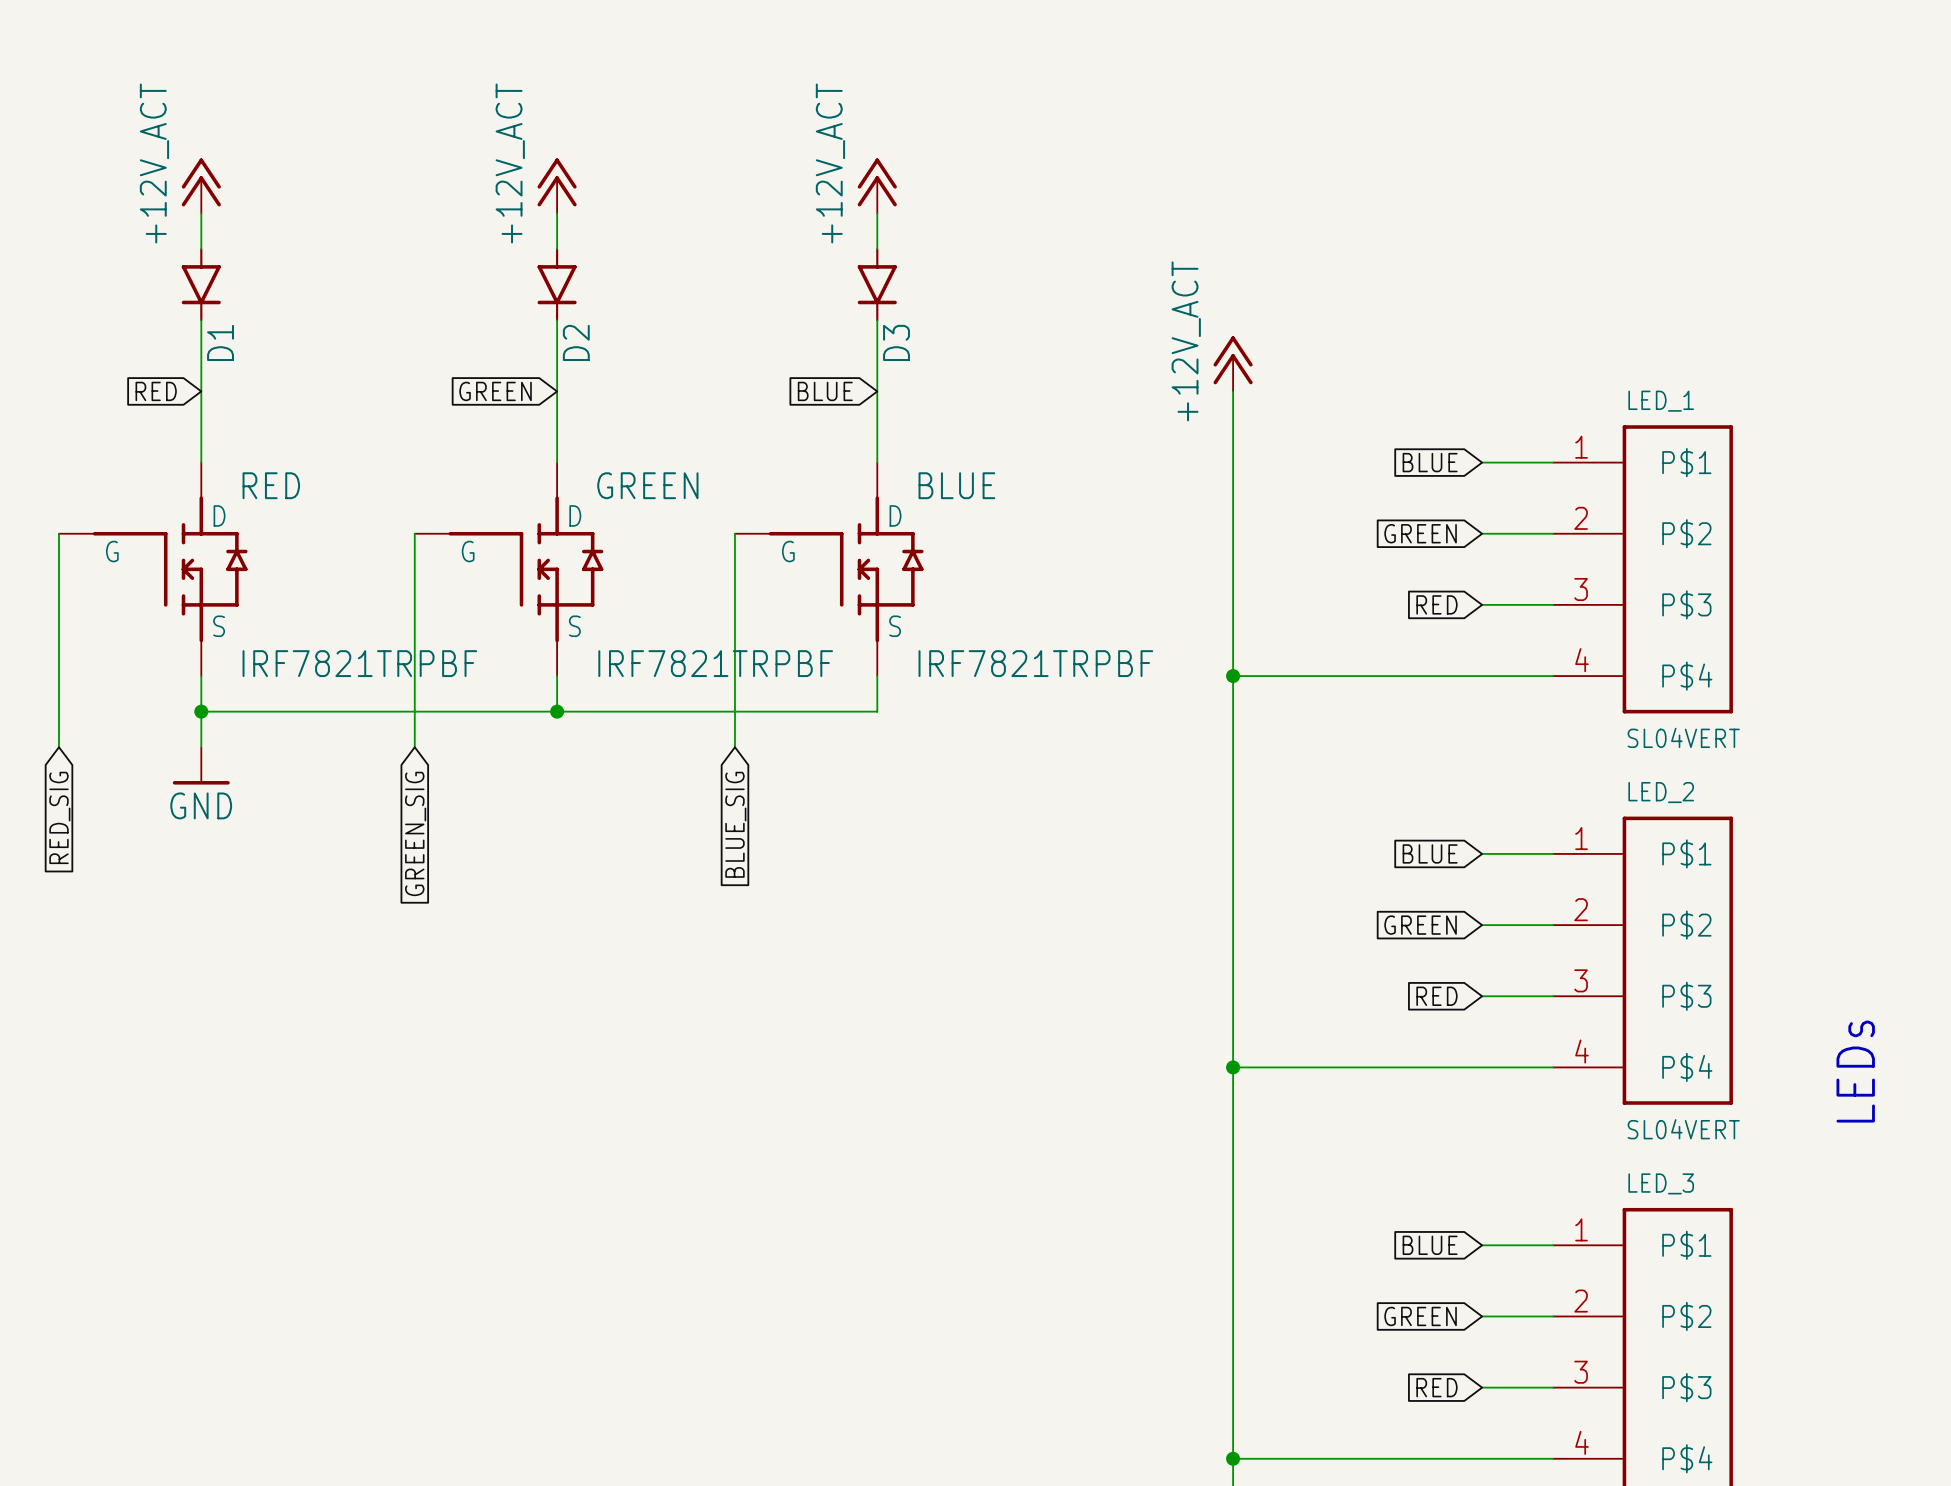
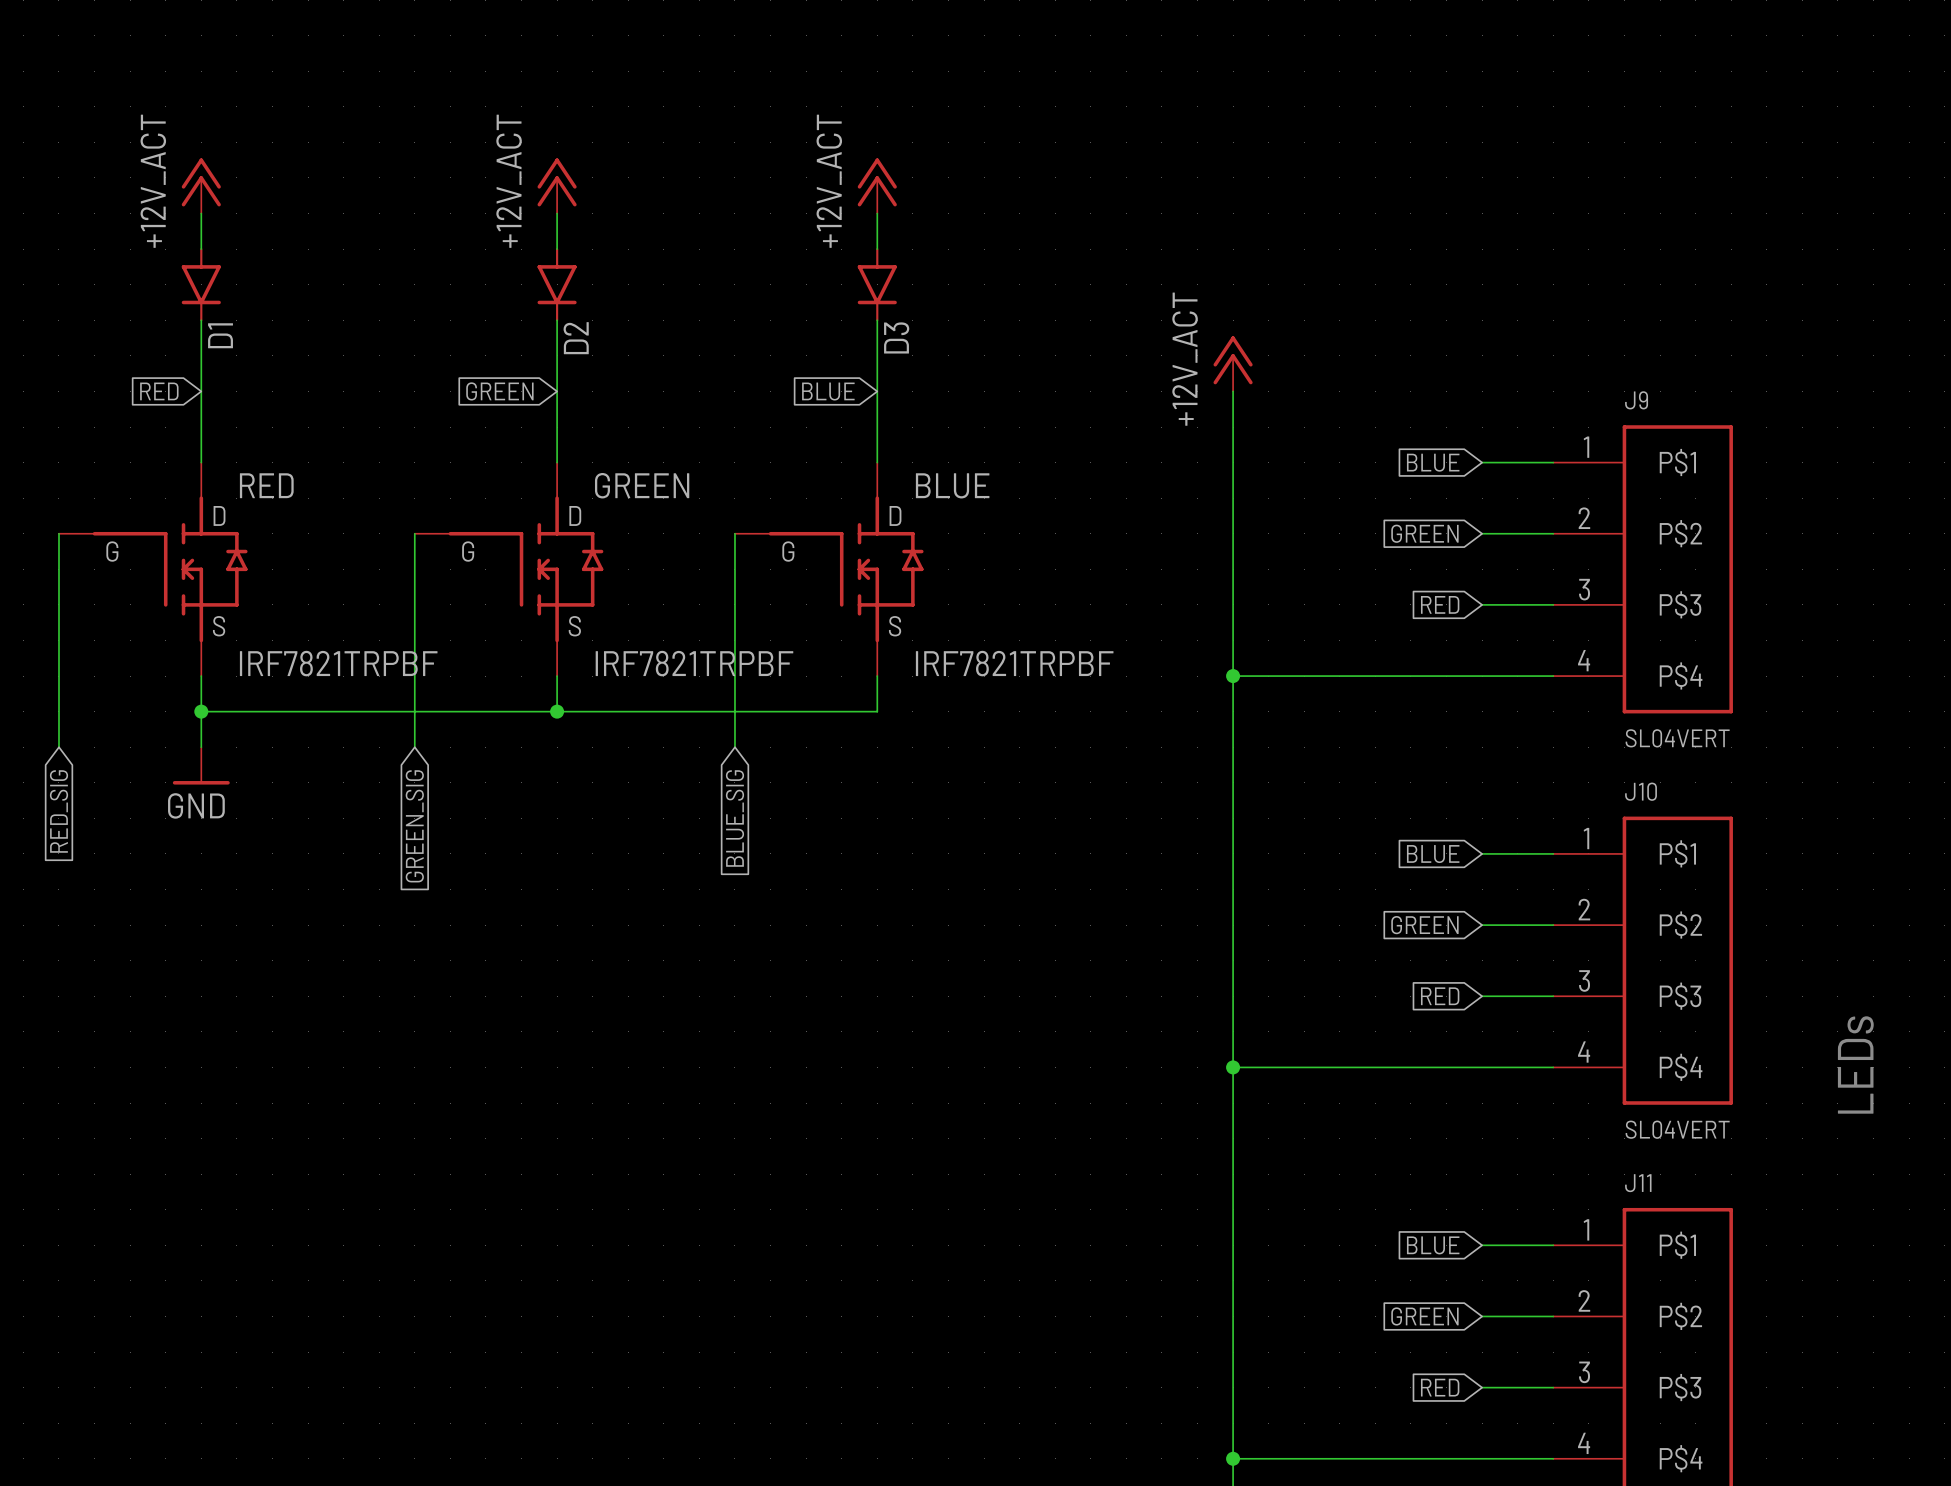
LED_1 name: LED_1 (1661, 401) -> J9 (1636, 400)
LED_2 name: LED_2 (1661, 792) -> J10 (1641, 791)
LED_3 name: LED_3 (1661, 1183) -> J11 (1638, 1183)

